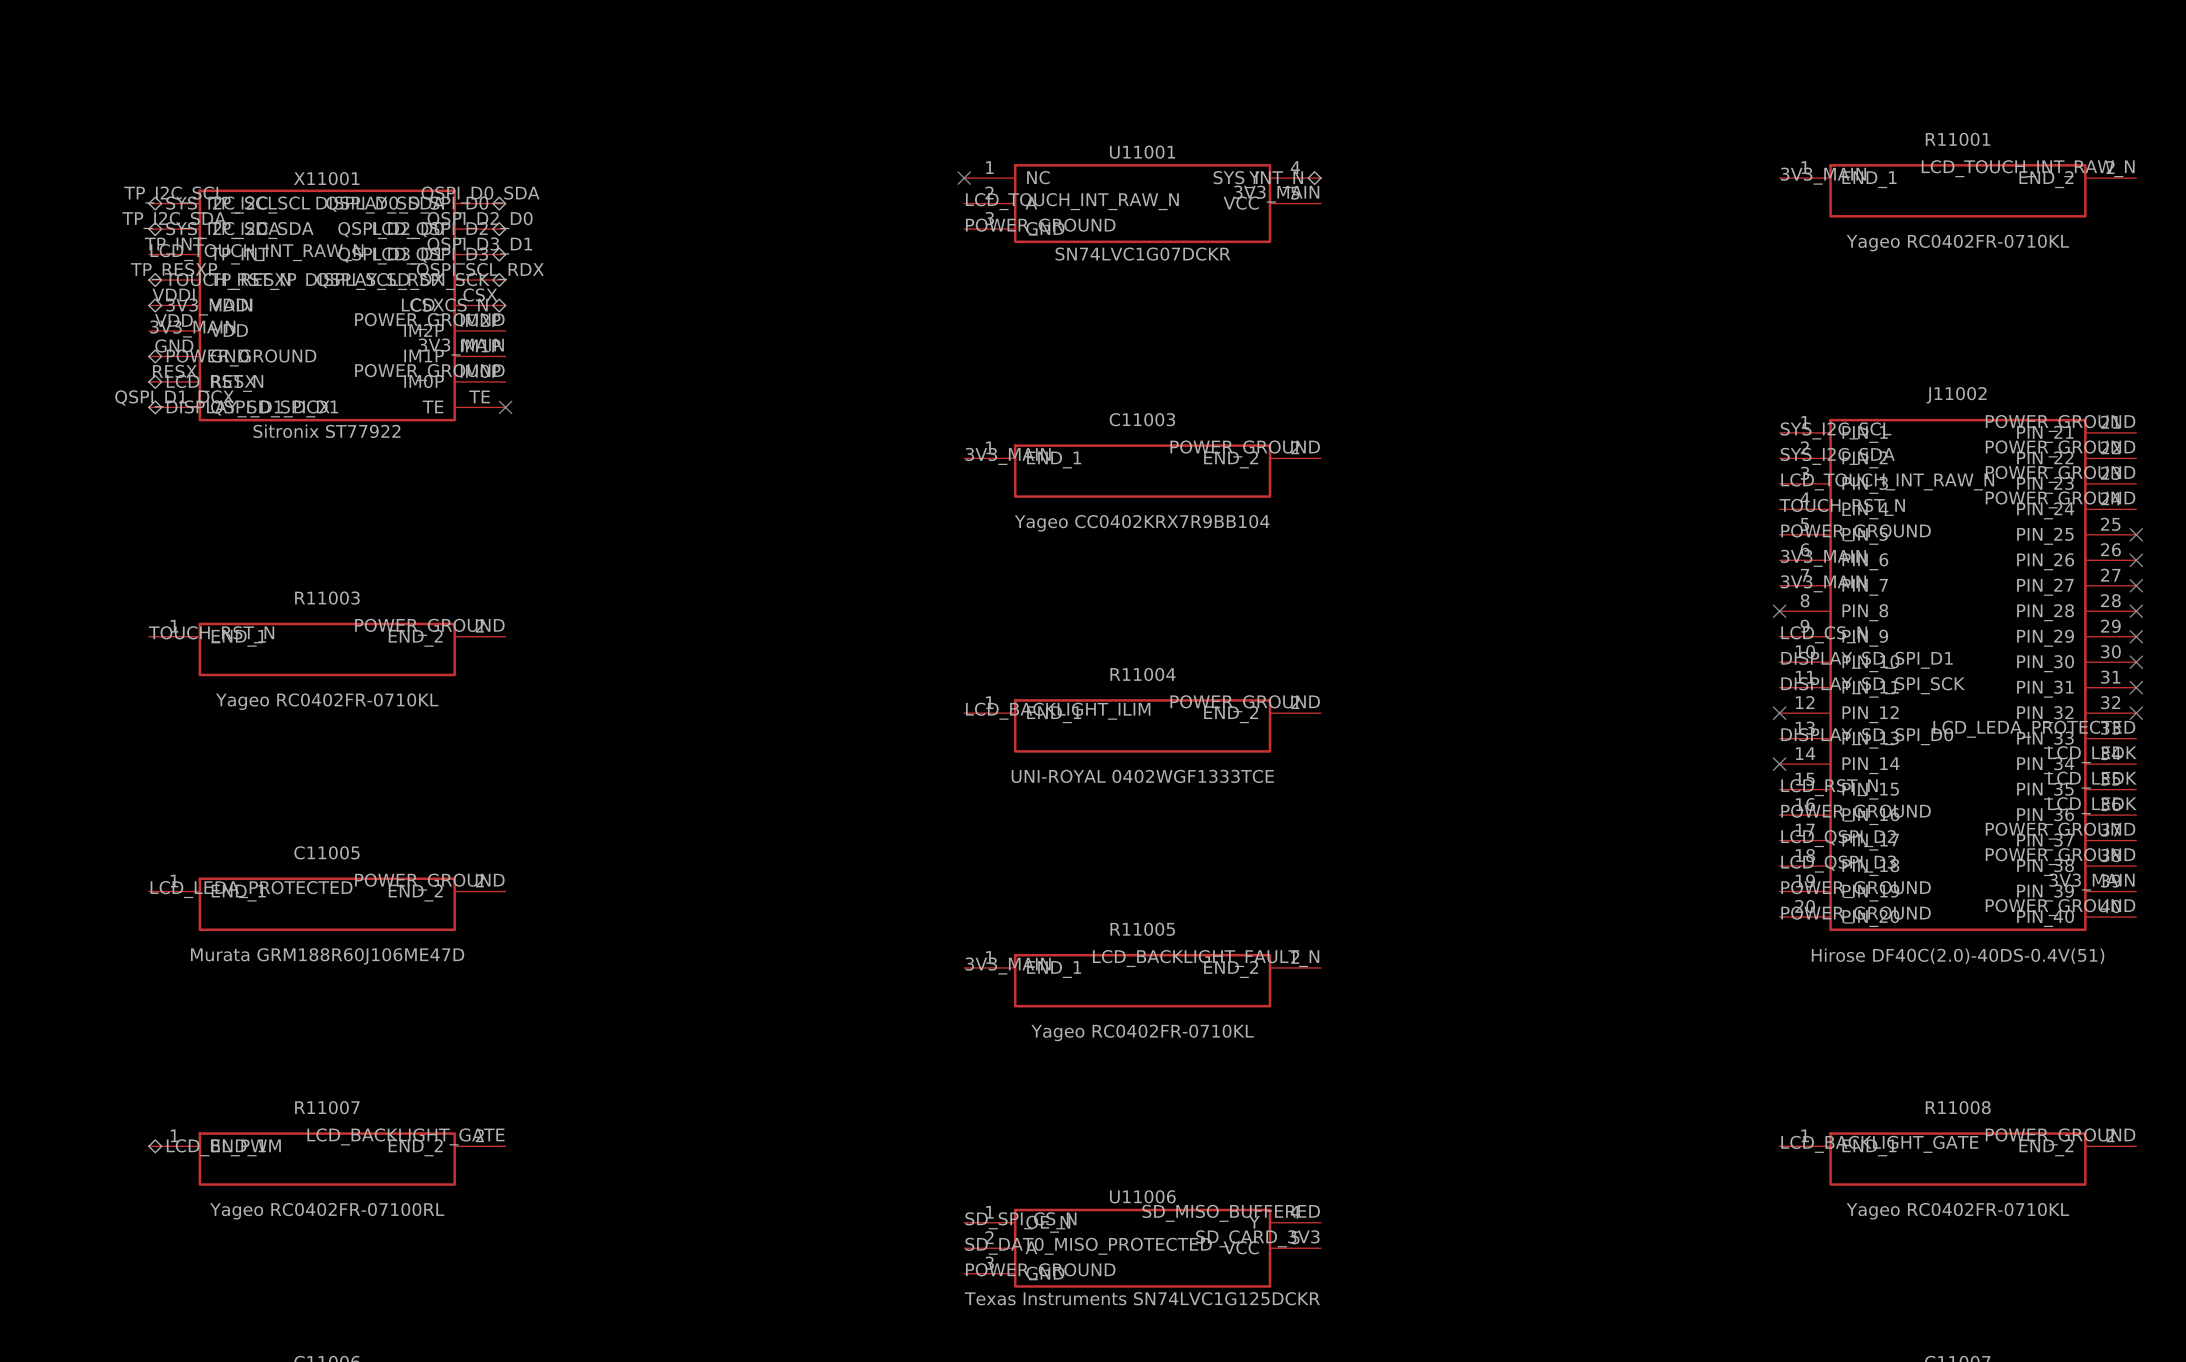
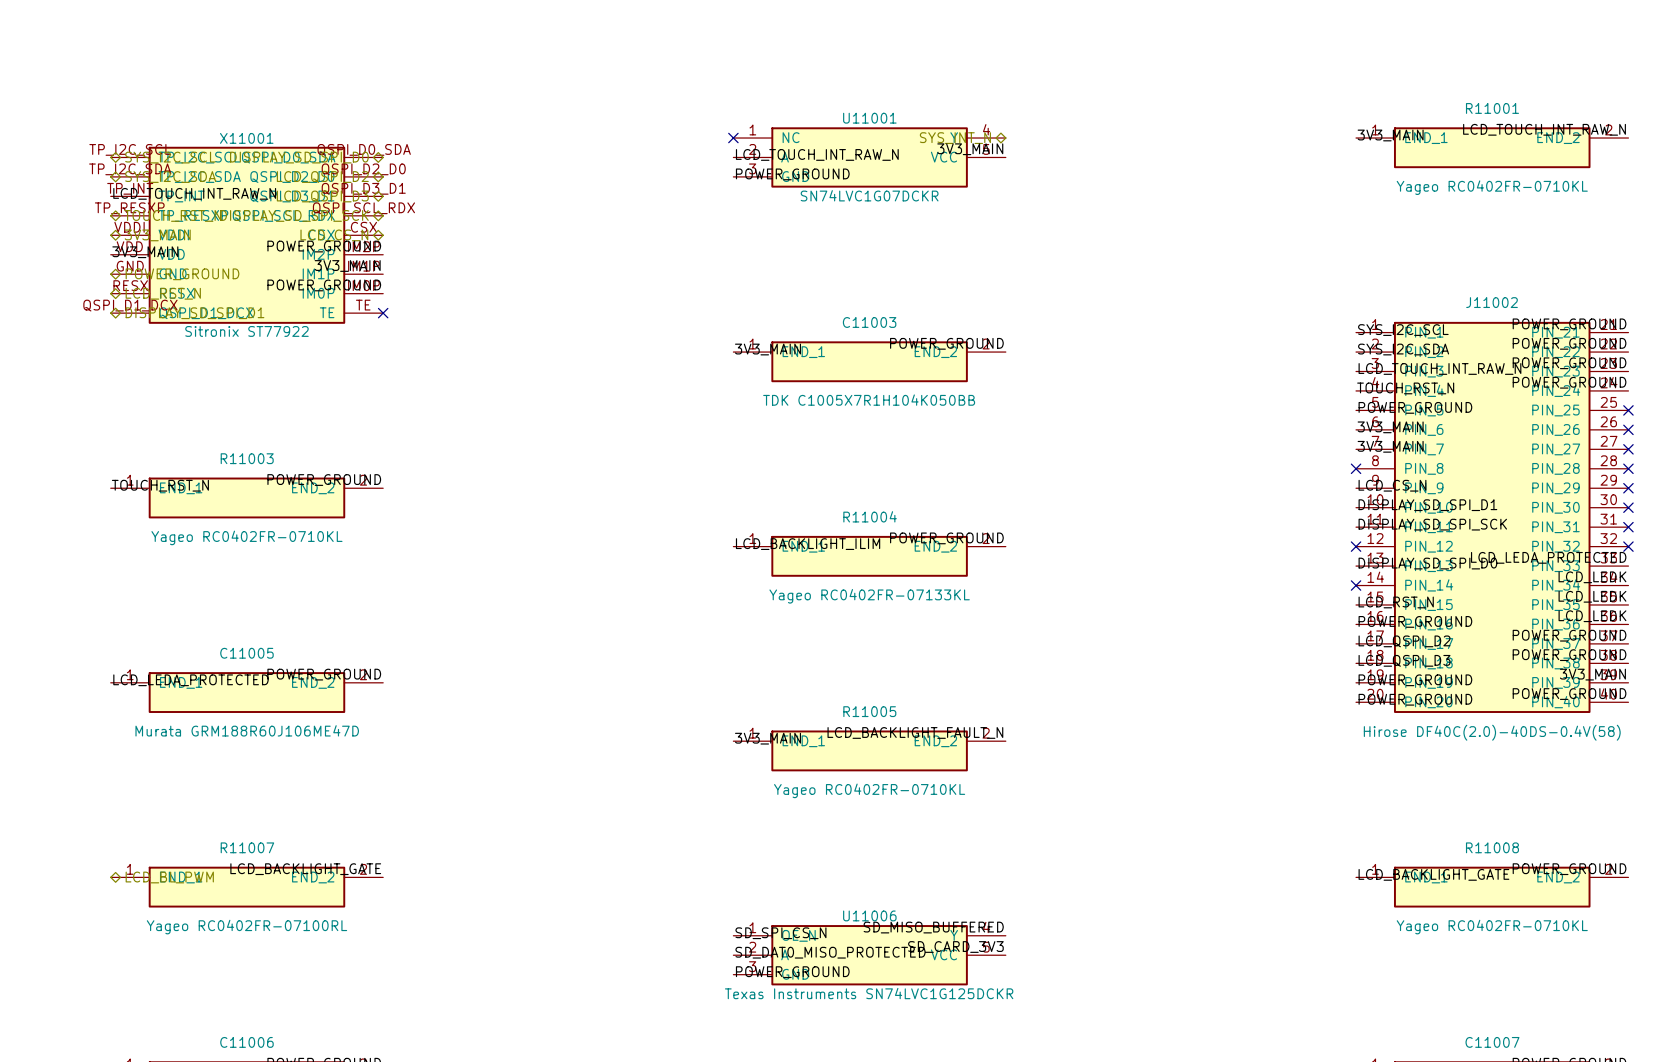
C11003 value: Yageo CC0402KRX7R9BB104 (1142, 523) -> TDK C1005X7R1H104K050BB (869, 400)
R11004 value: UNI-ROYAL 0402WGF1333TCE (1142, 776) -> Yageo RC0402FR-07133KL (869, 596)
J11002 value: Hirose DF40C(2.0)-40DS-0.4V(51) (1958, 956) -> Hirose DF40C(2.0)-40DS-0.4V(58) (1492, 732)

